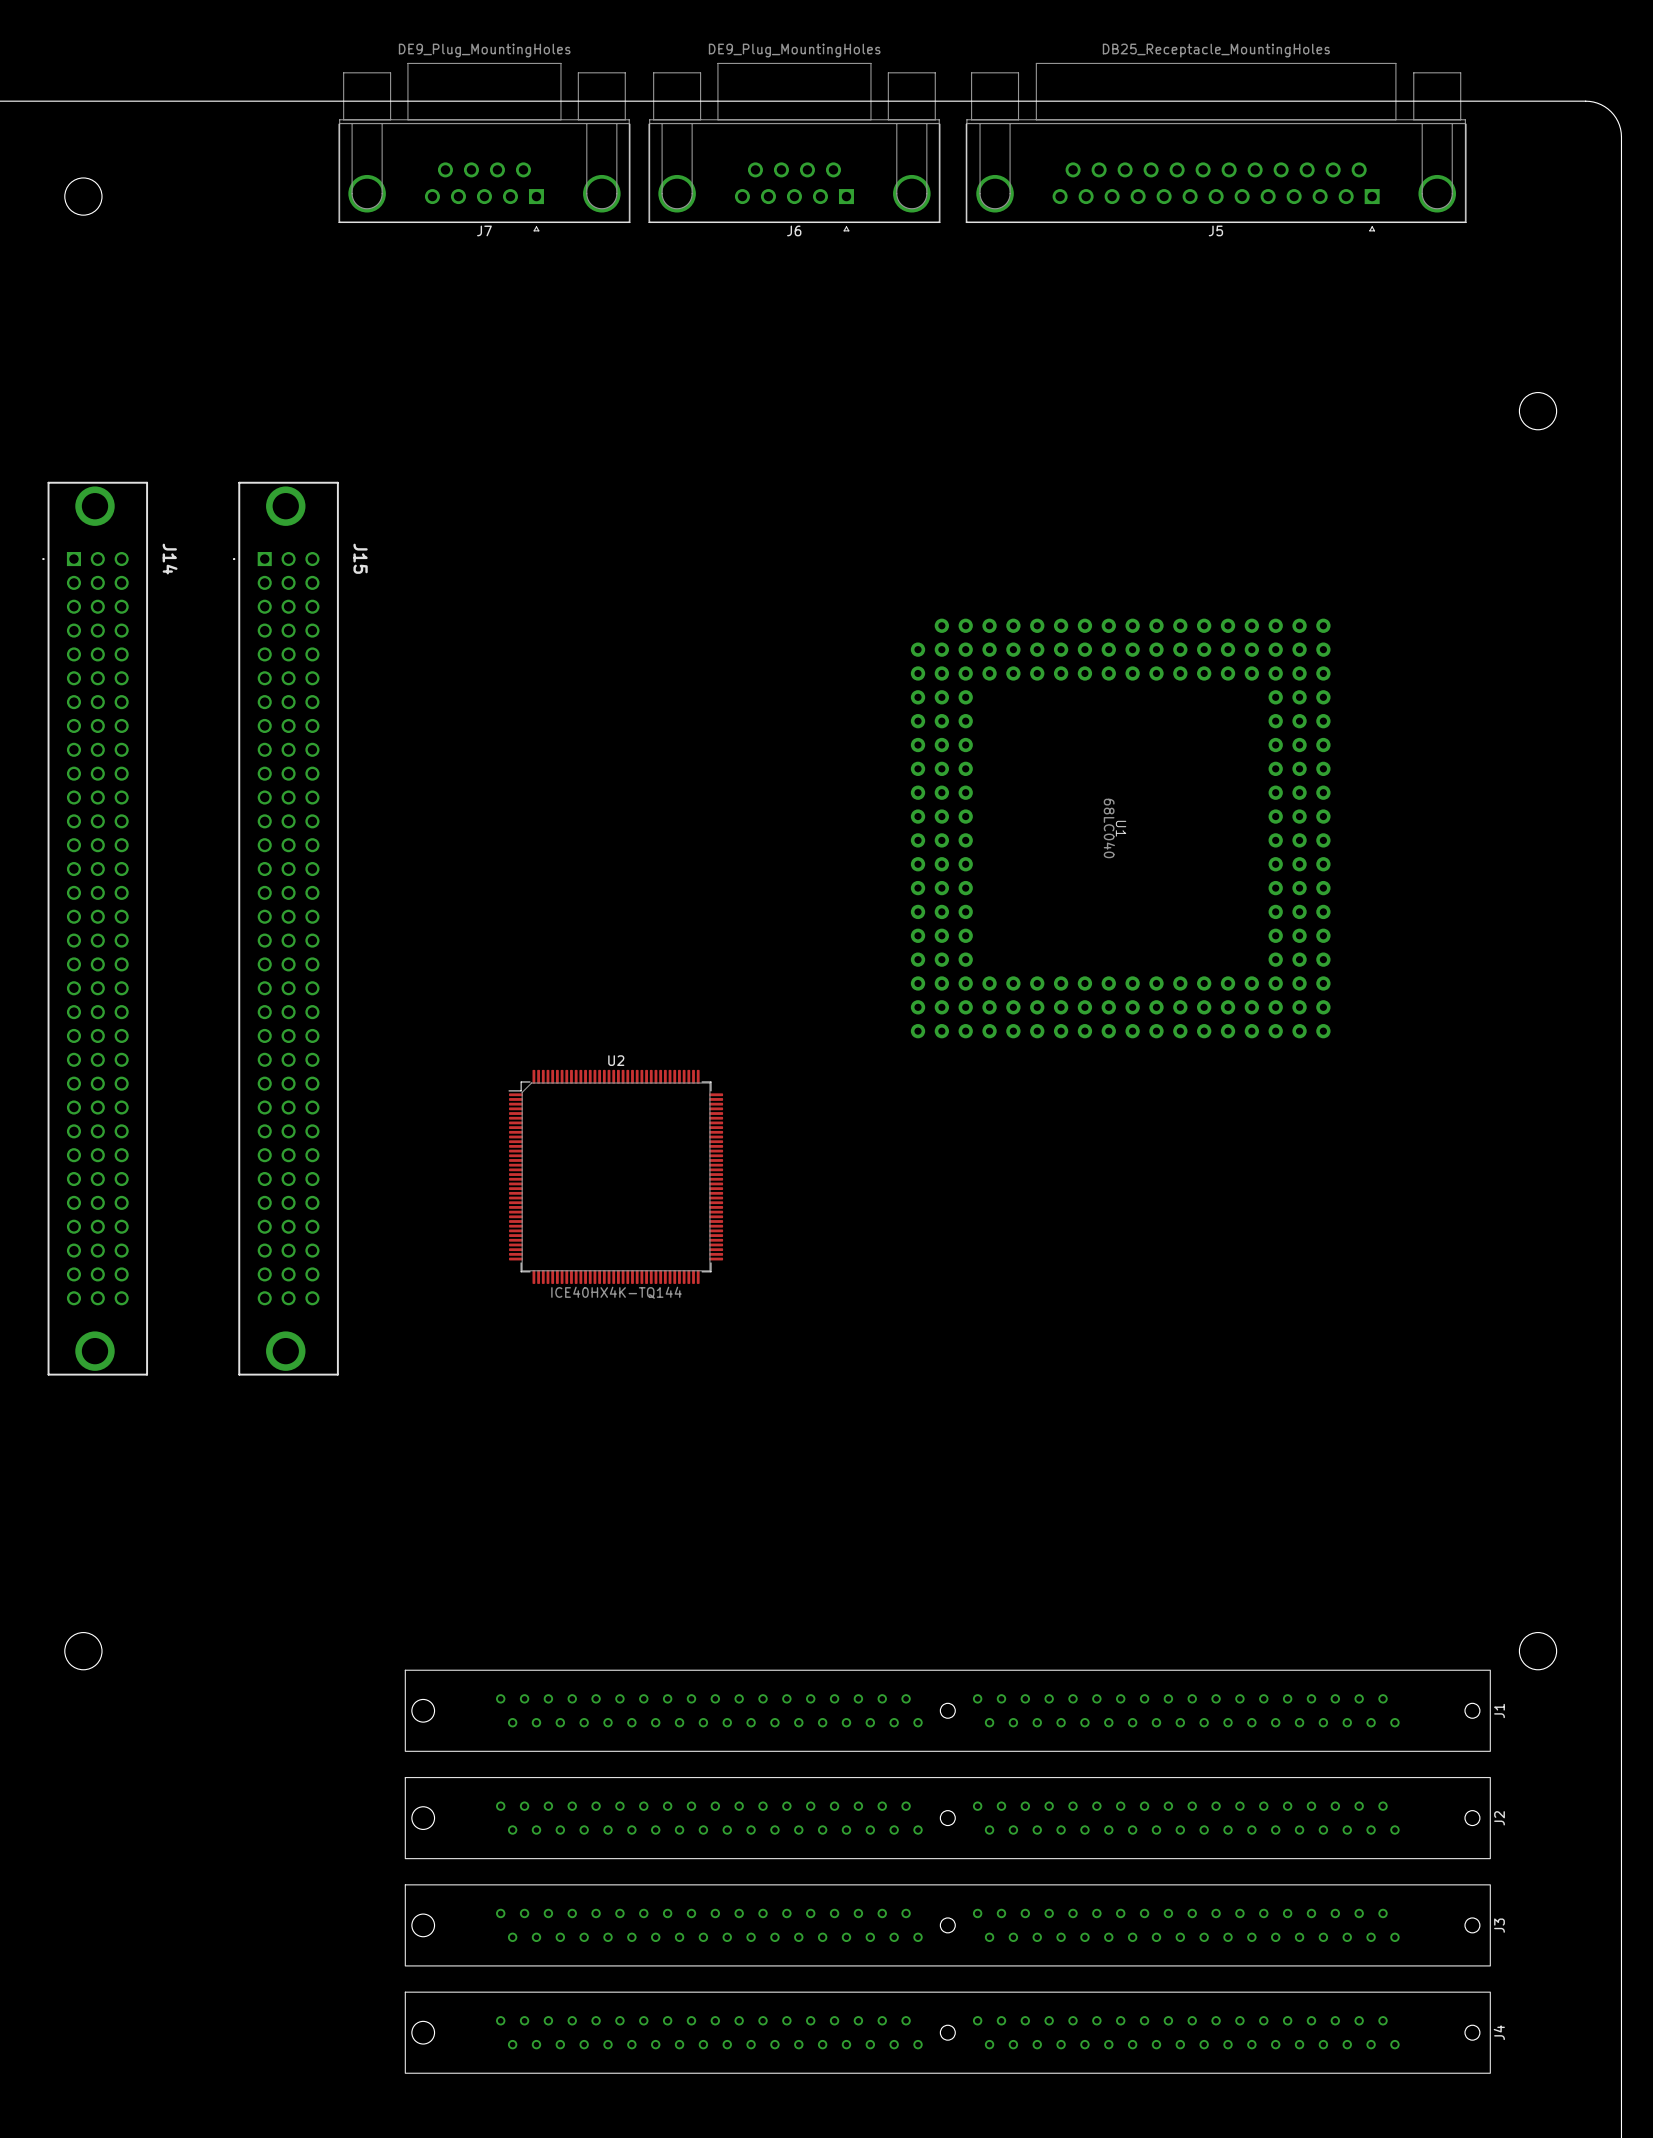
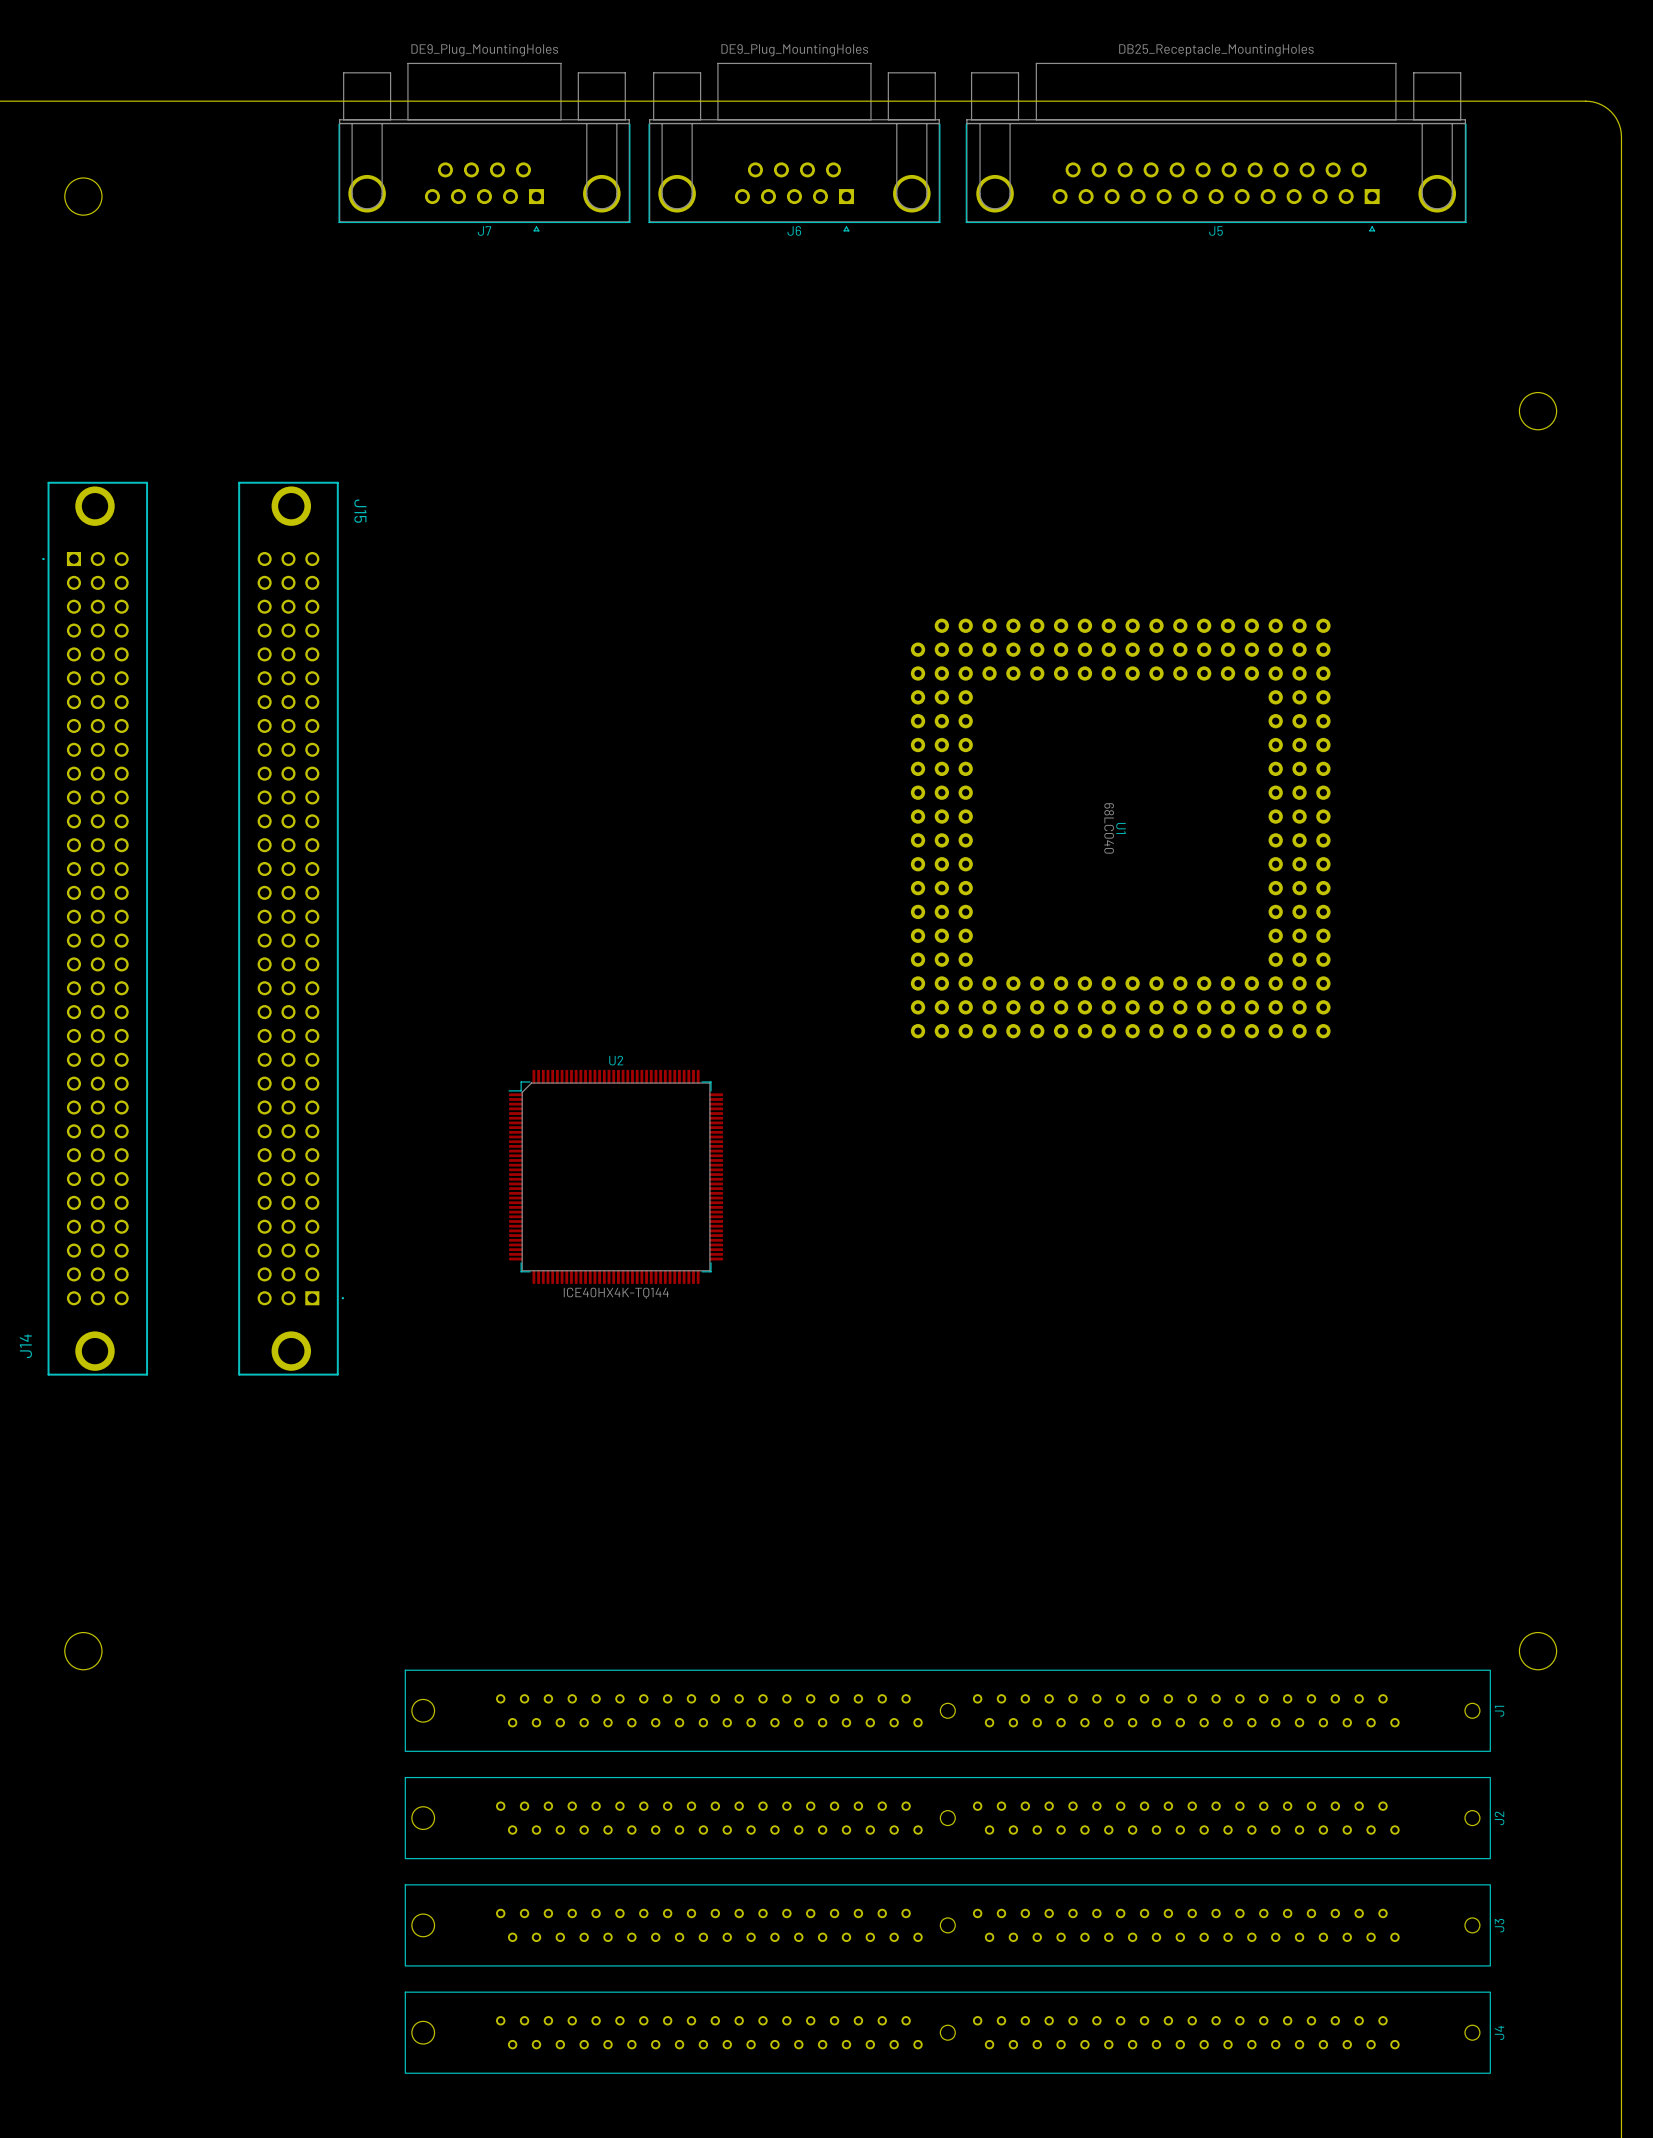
J15 name position: J15 (360, 558) -> J15 (360, 511)
J14 name rotation: 0° (170, 559) -> 180° (25, 1346)
J14 name position: J14 (170, 559) -> J14 (25, 1346)
J15 rotation: 0° (286, 928) -> 180° (291, 928)

